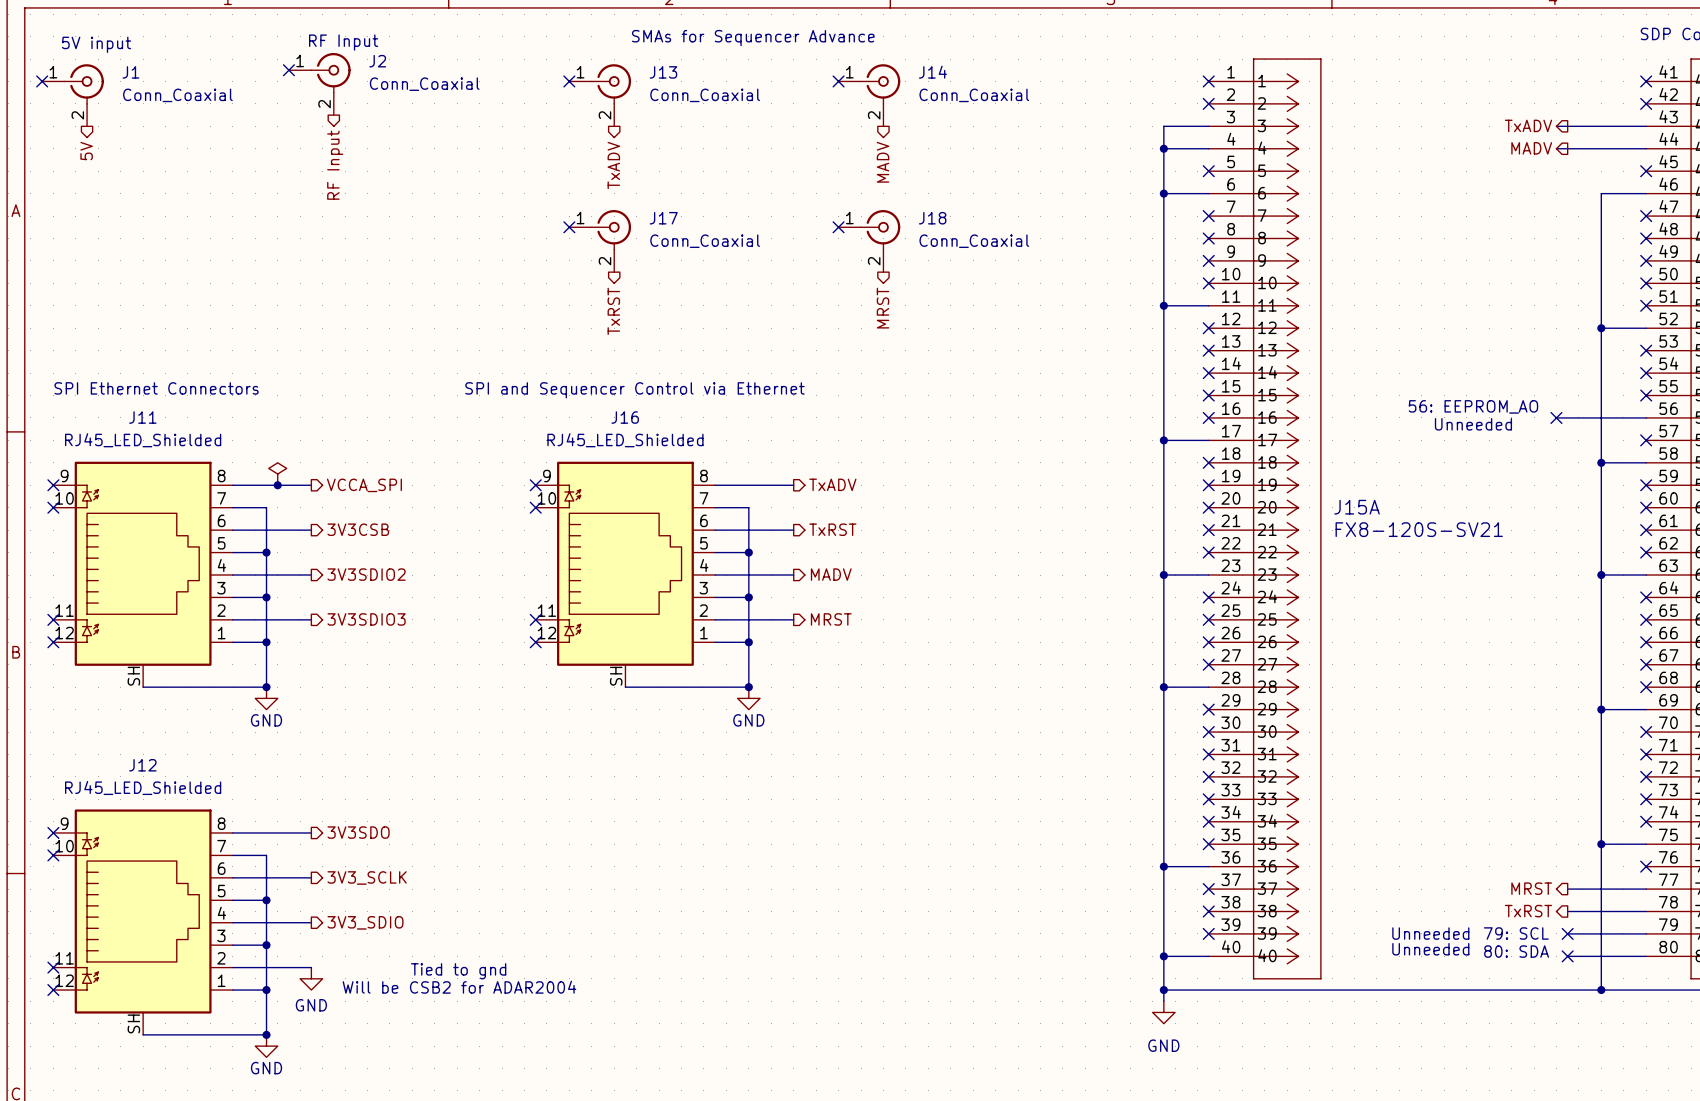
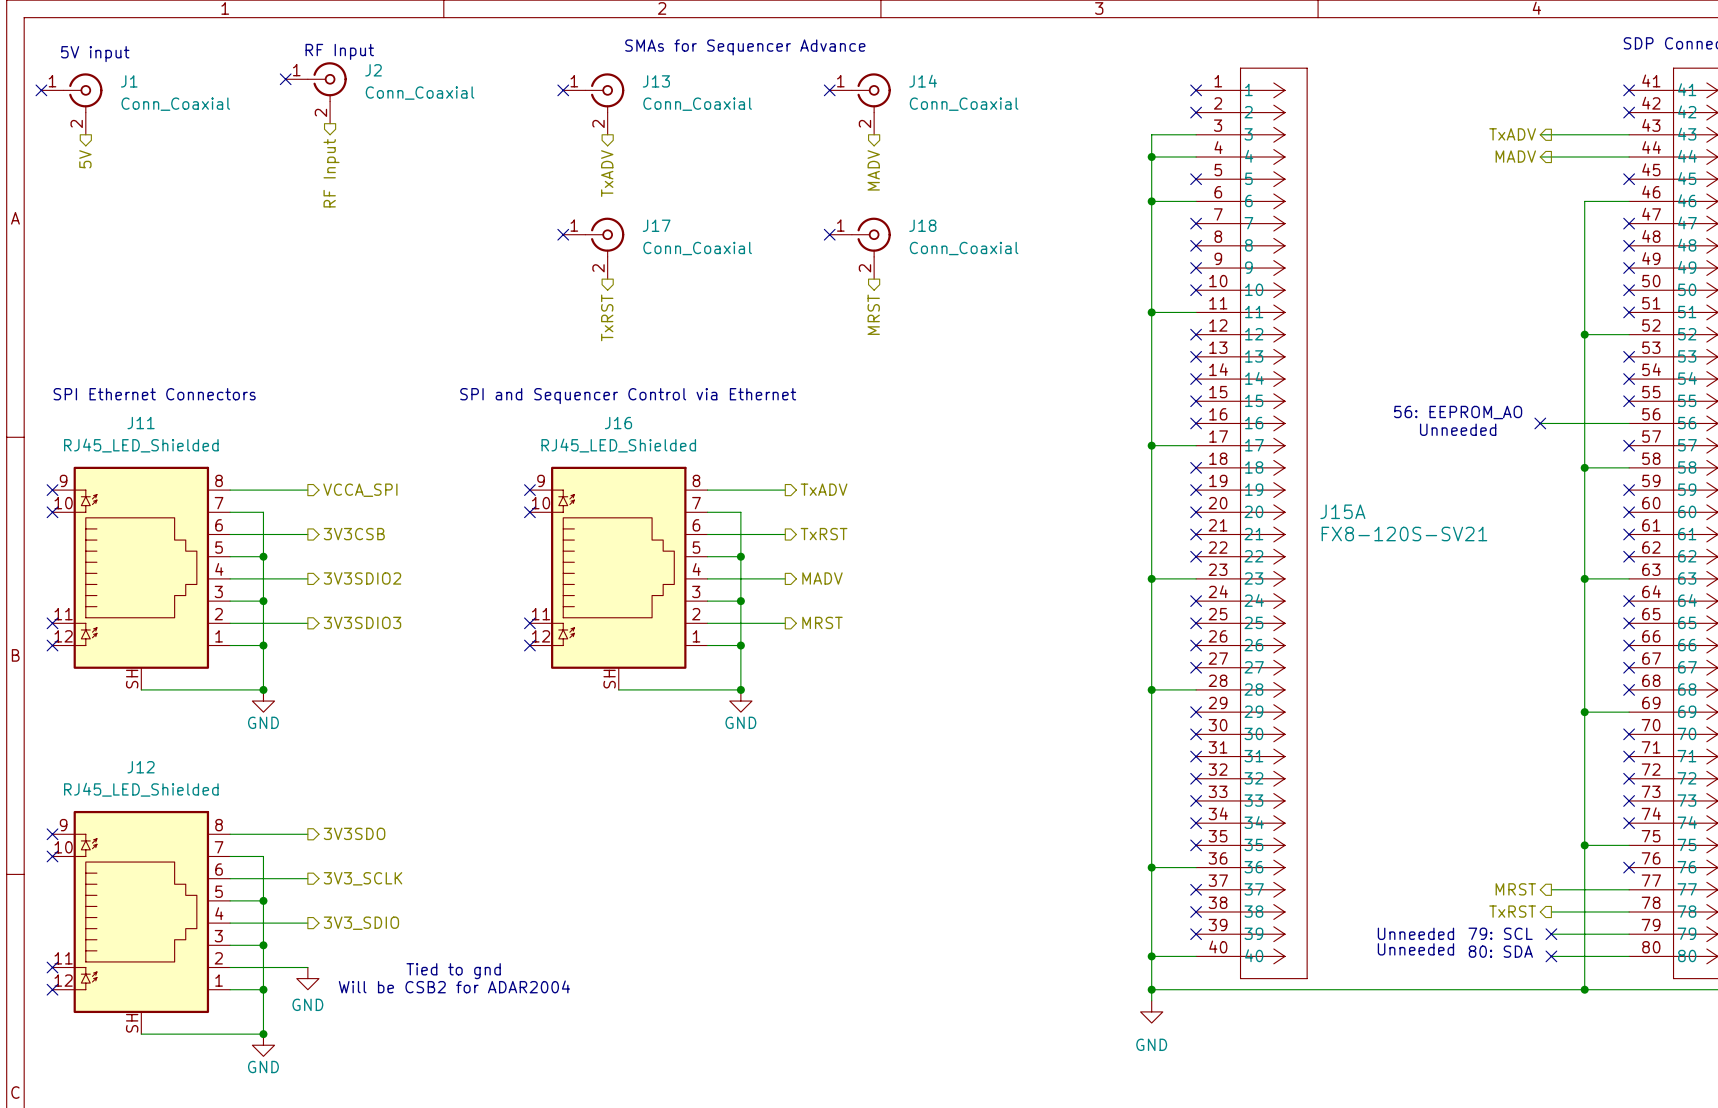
power symbol: (277, 474) -> none
junction: (277, 485) -> none

